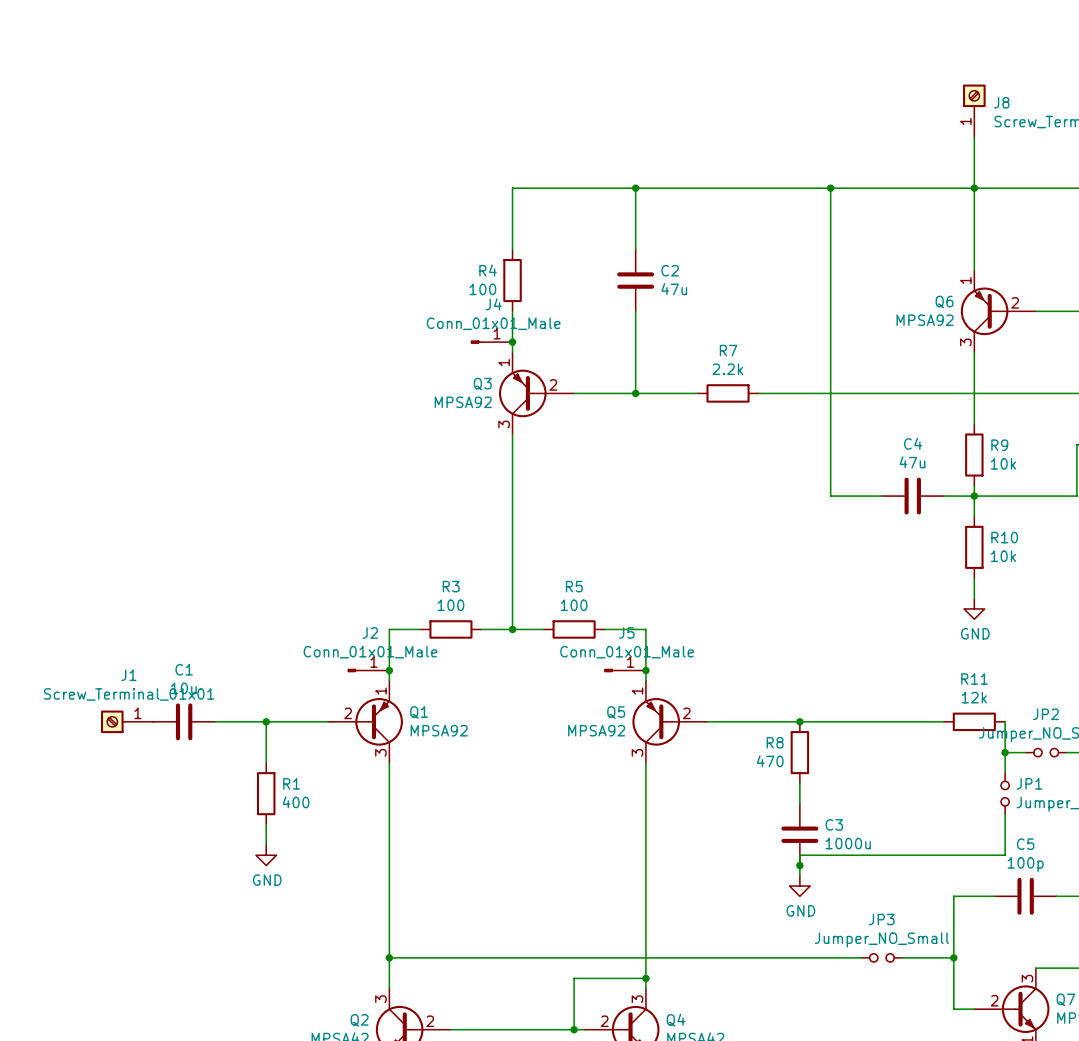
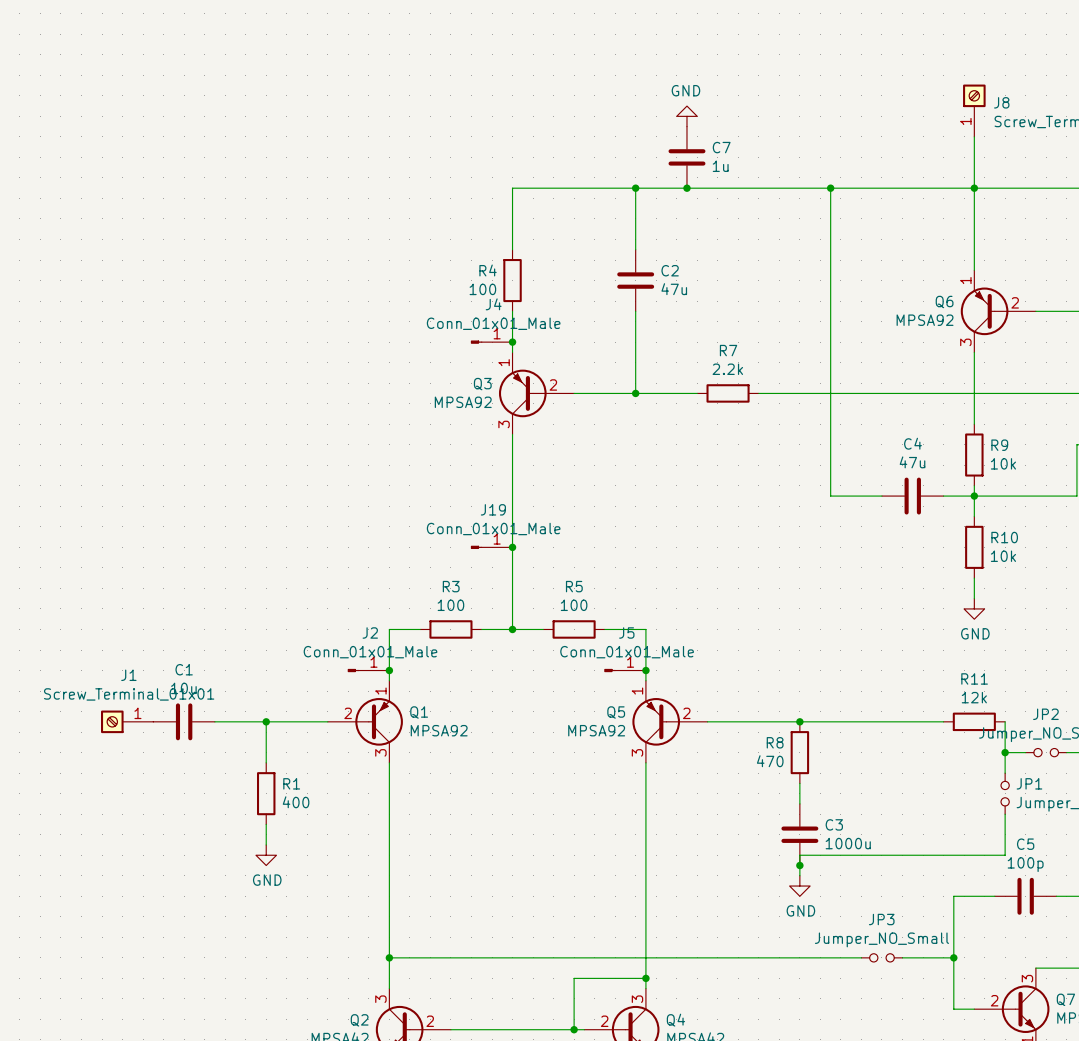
power symbol: none -> GND (686, 116)
C7: none -> 1u (686, 157)
junction: none -> (686, 188)
J19: none -> Conn_01x01_Male (491, 547)
junction: none -> (512, 547)

